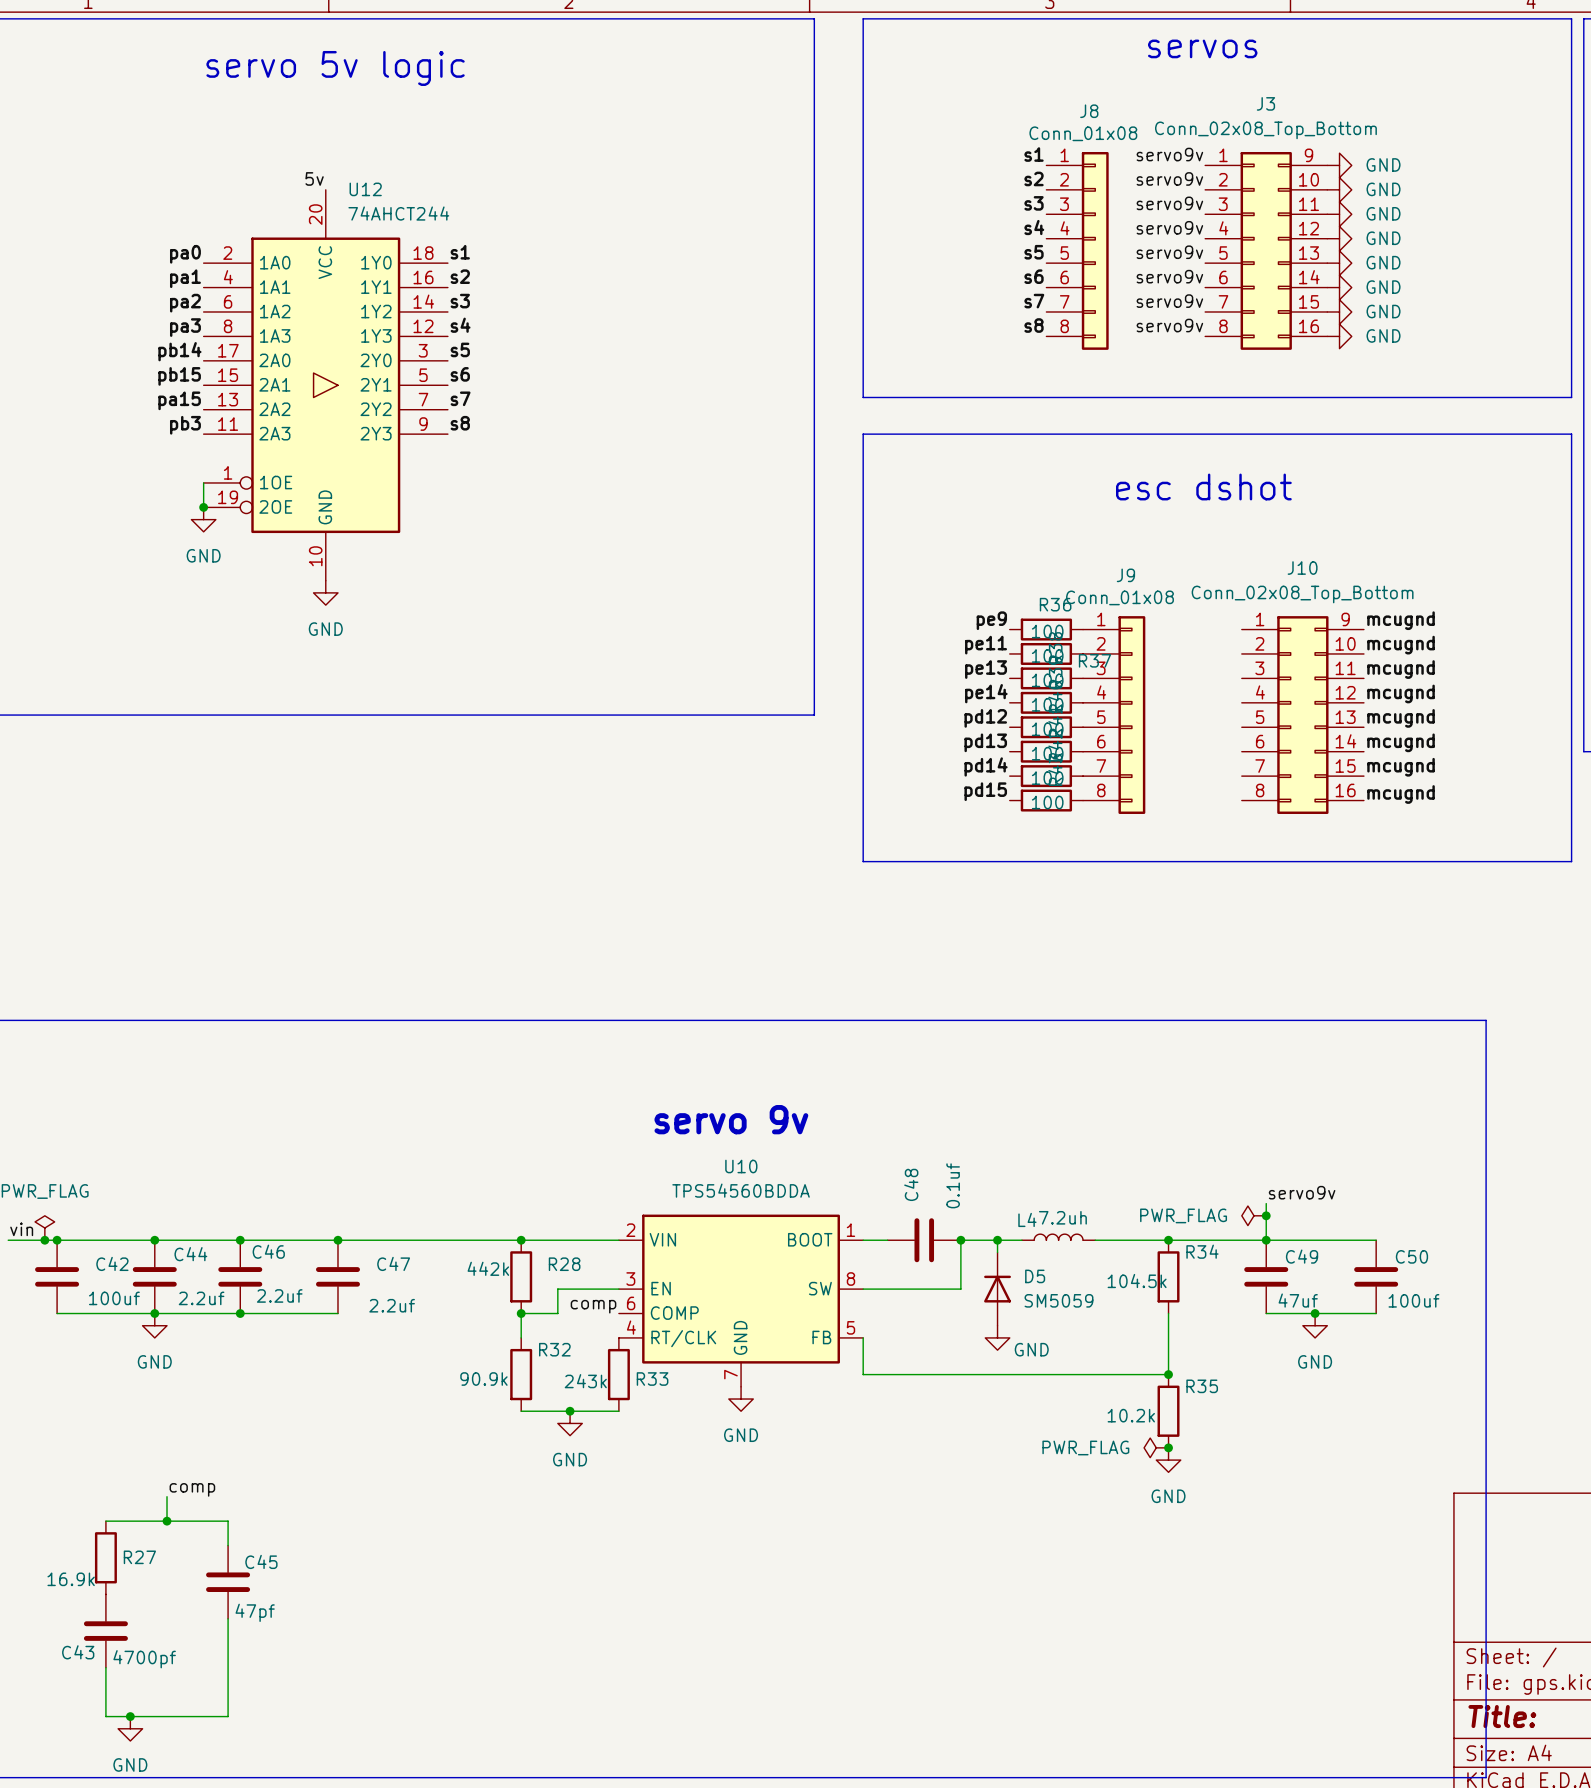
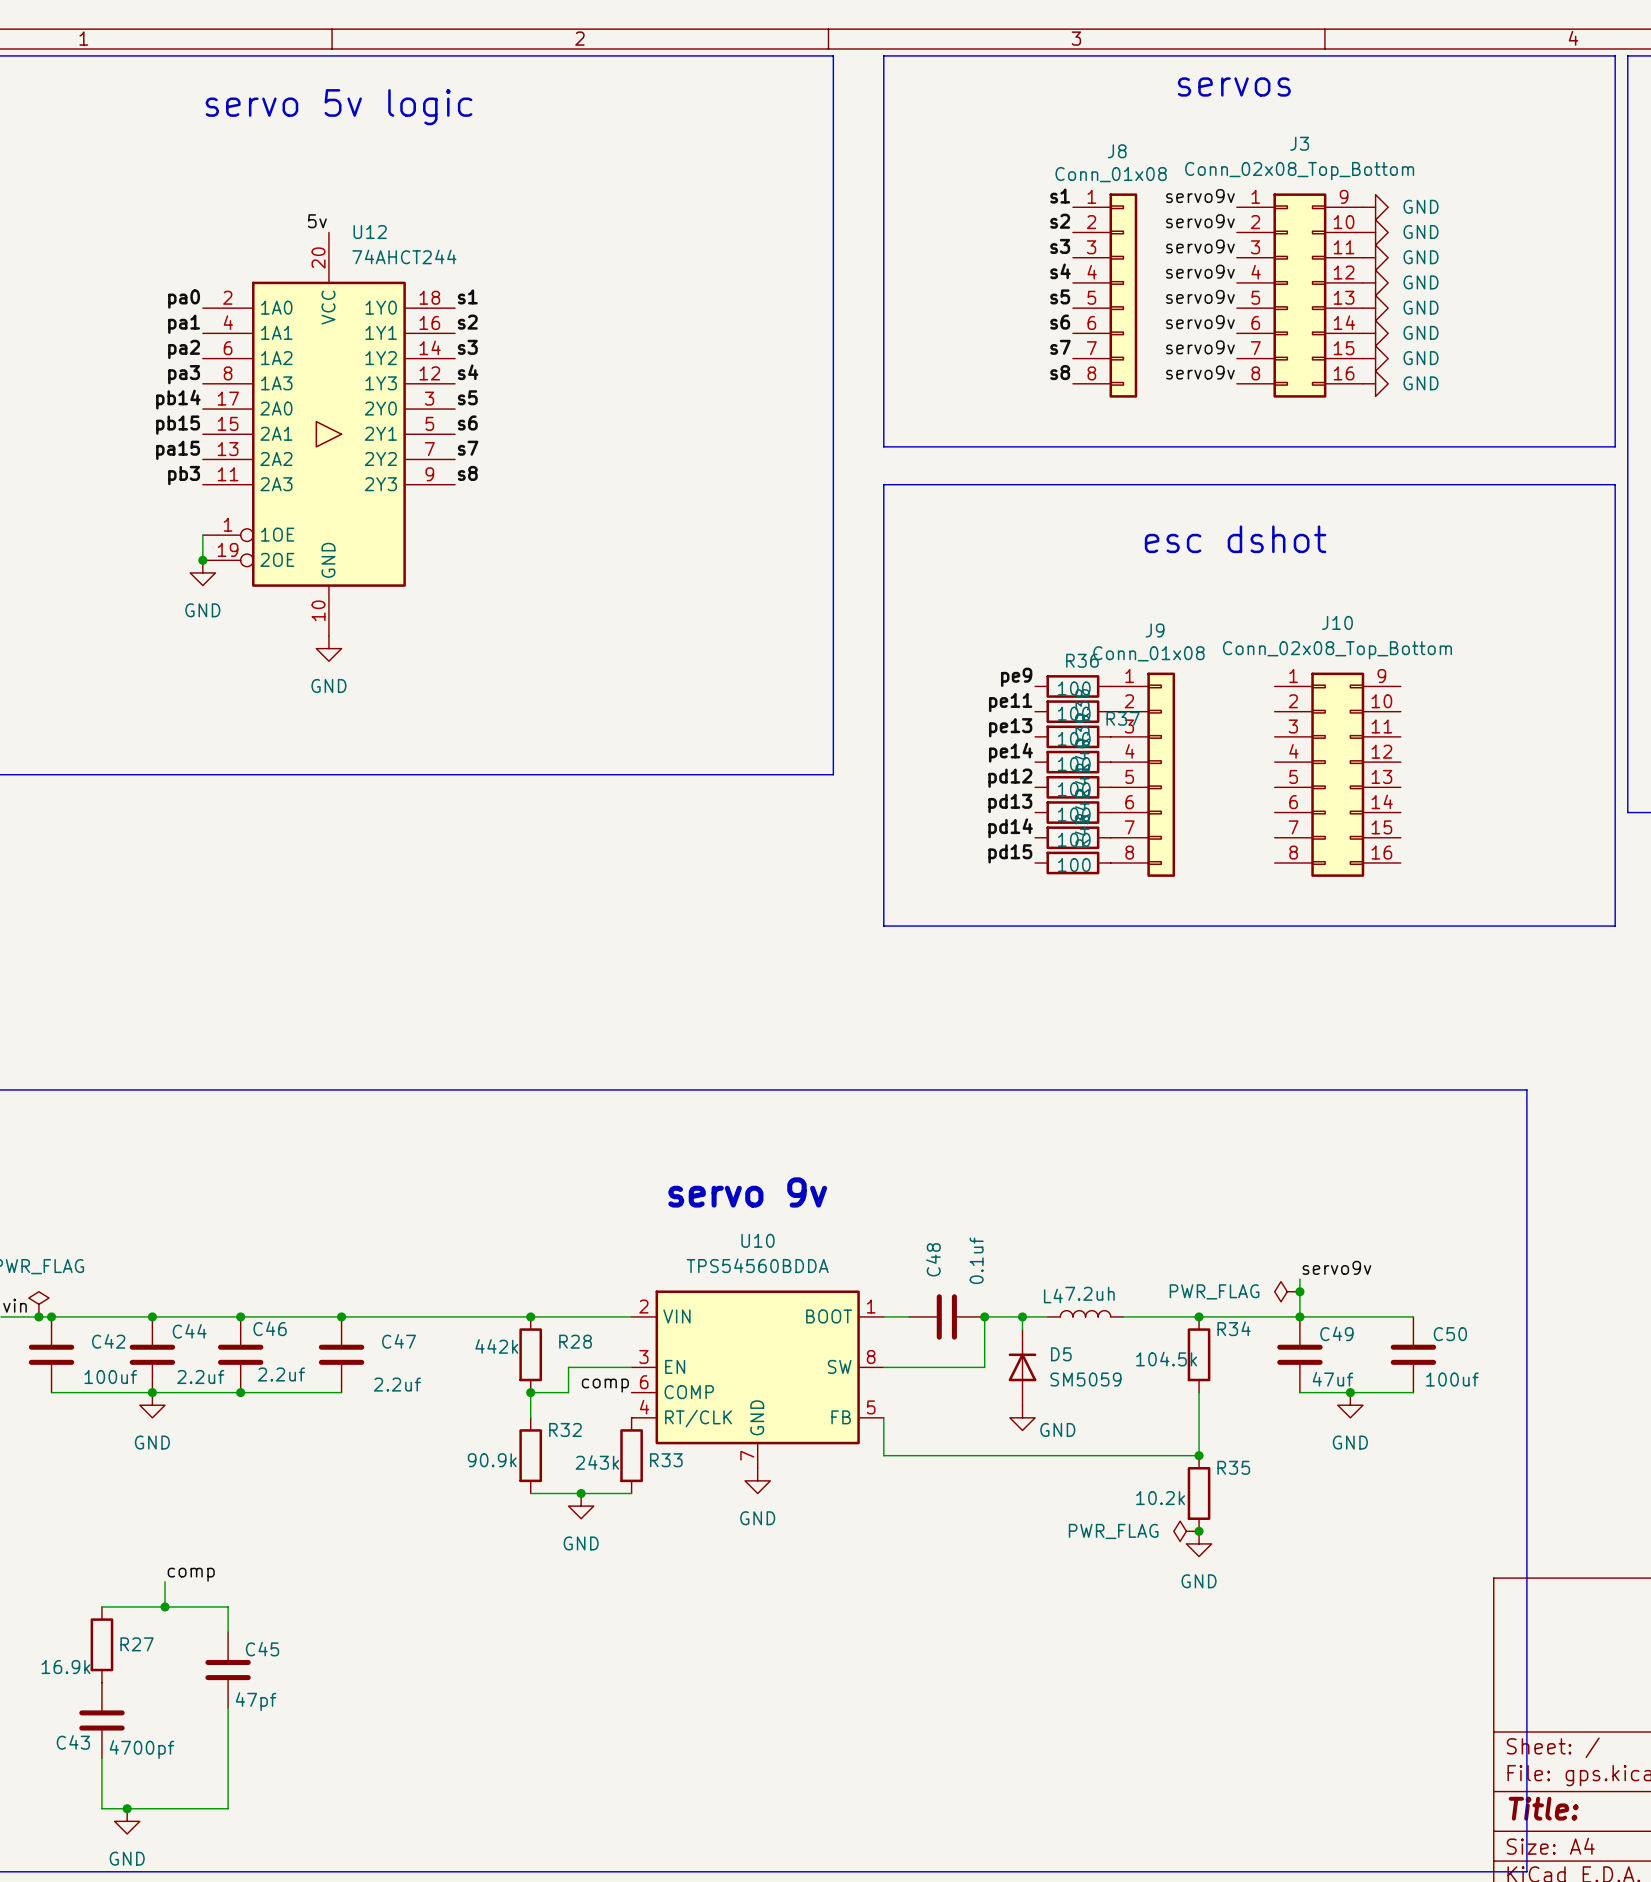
label: mcugnd (1401, 620) -> none
label: mcugnd (1401, 645) -> none
label: mcugnd (1401, 669) -> none
label: mcugnd (1401, 693) -> none
label: mcugnd (1401, 718) -> none
label: mcugnd (1401, 742) -> none
label: mcugnd (1401, 767) -> none
label: mcugnd (1401, 794) -> none

